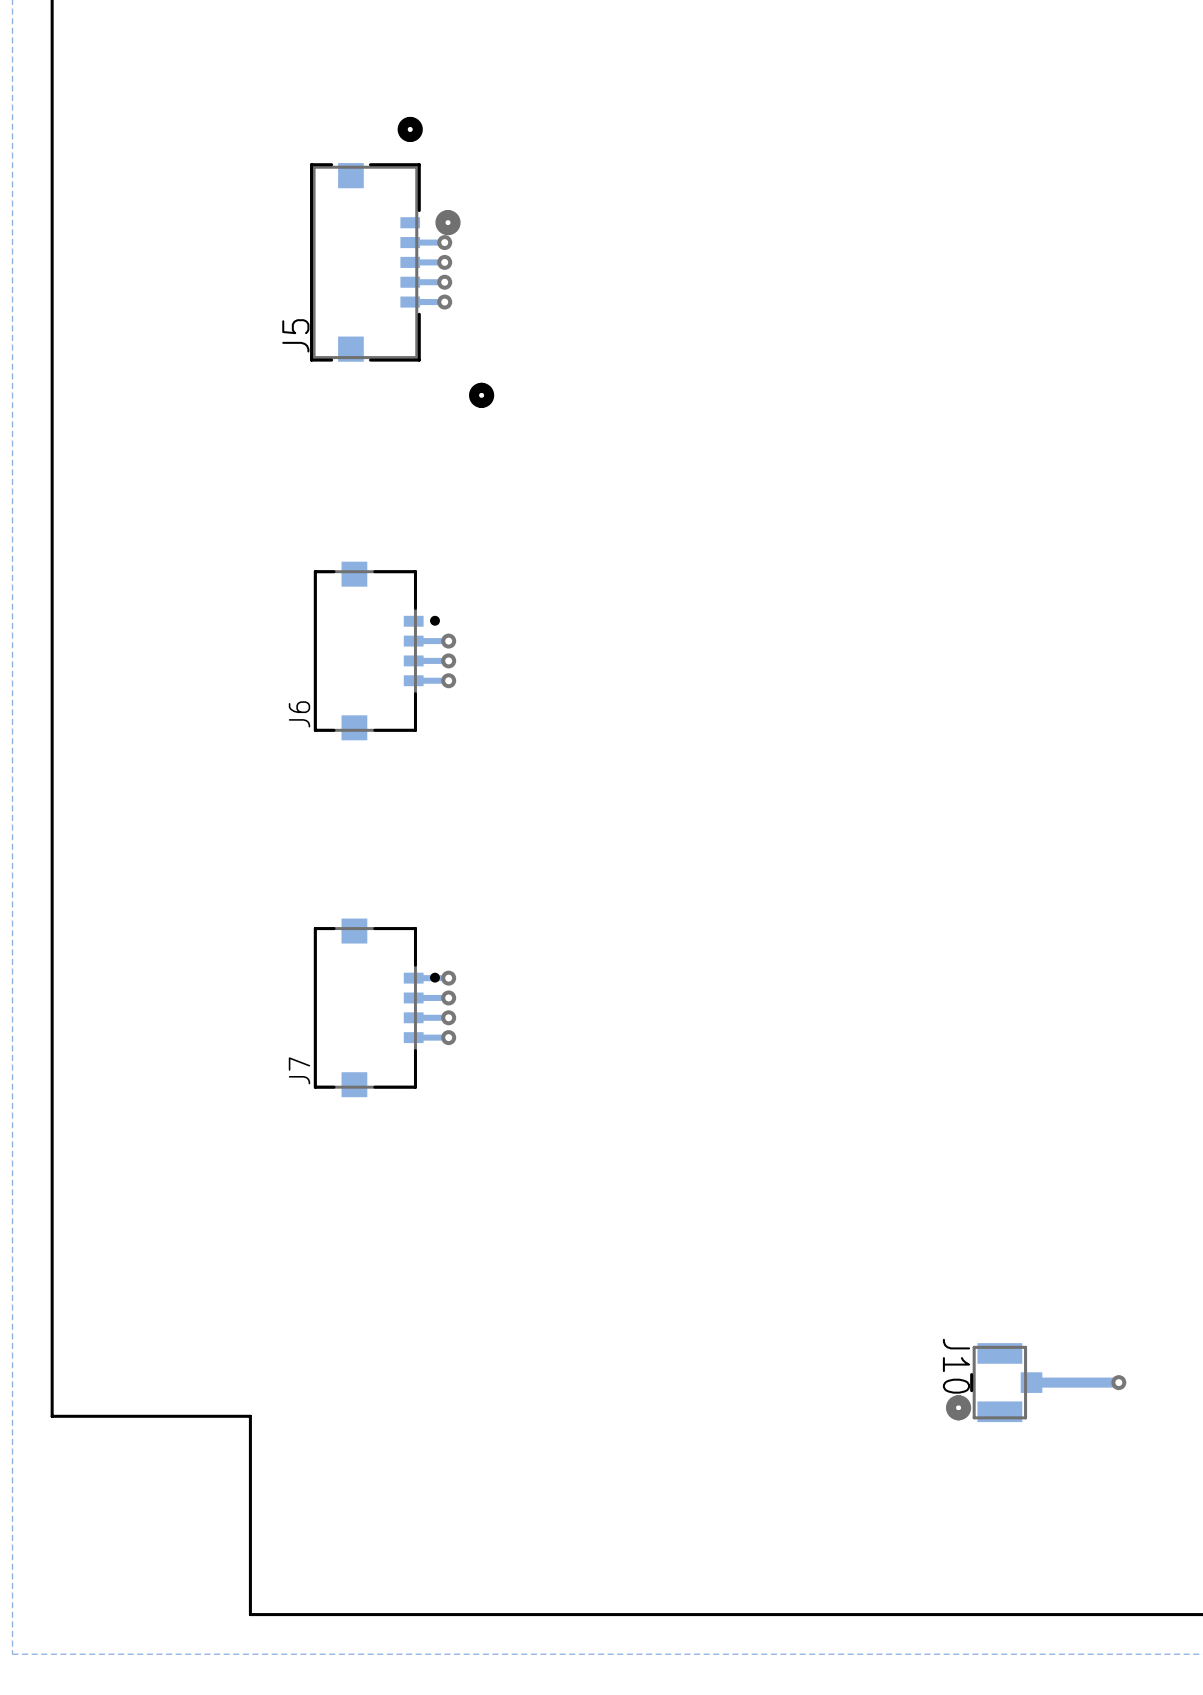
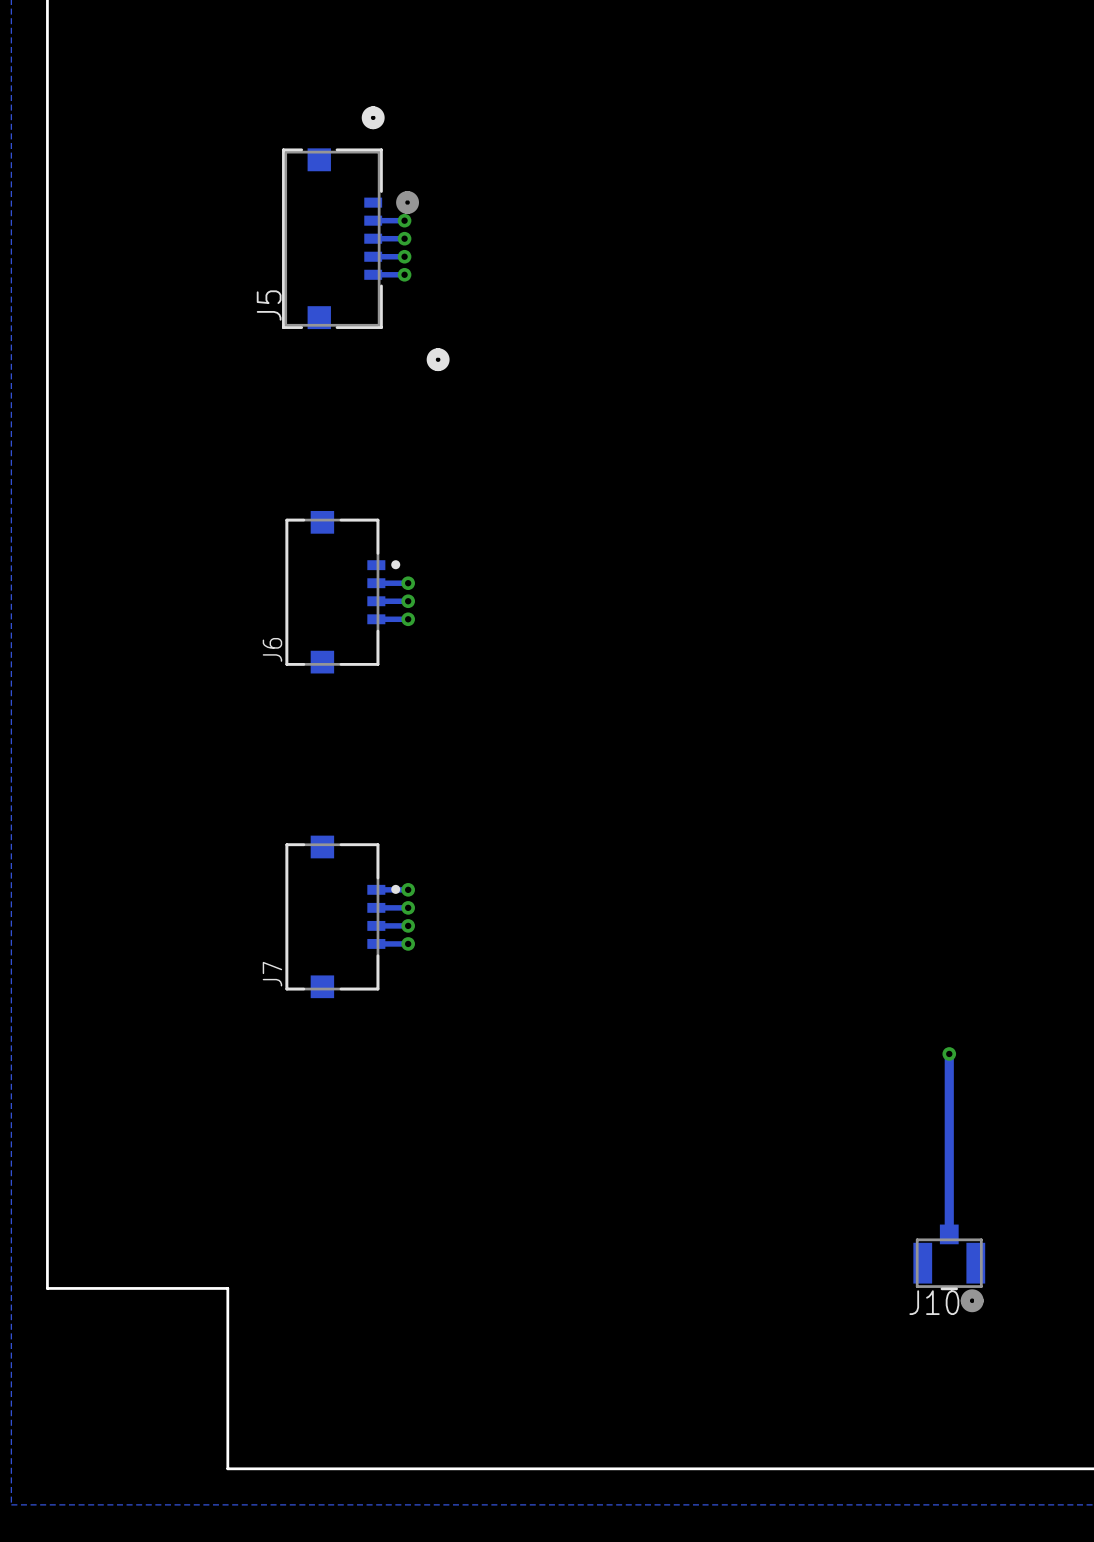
track: none -> (949, 1053) (949, 1234)
via: none -> (949, 1053)
J10 rotation: 0° (994, 1382) -> 90° counterclockwise (949, 1268)
track: (1118, 1382) (1031, 1382) -> none
via: (1118, 1382) -> none

